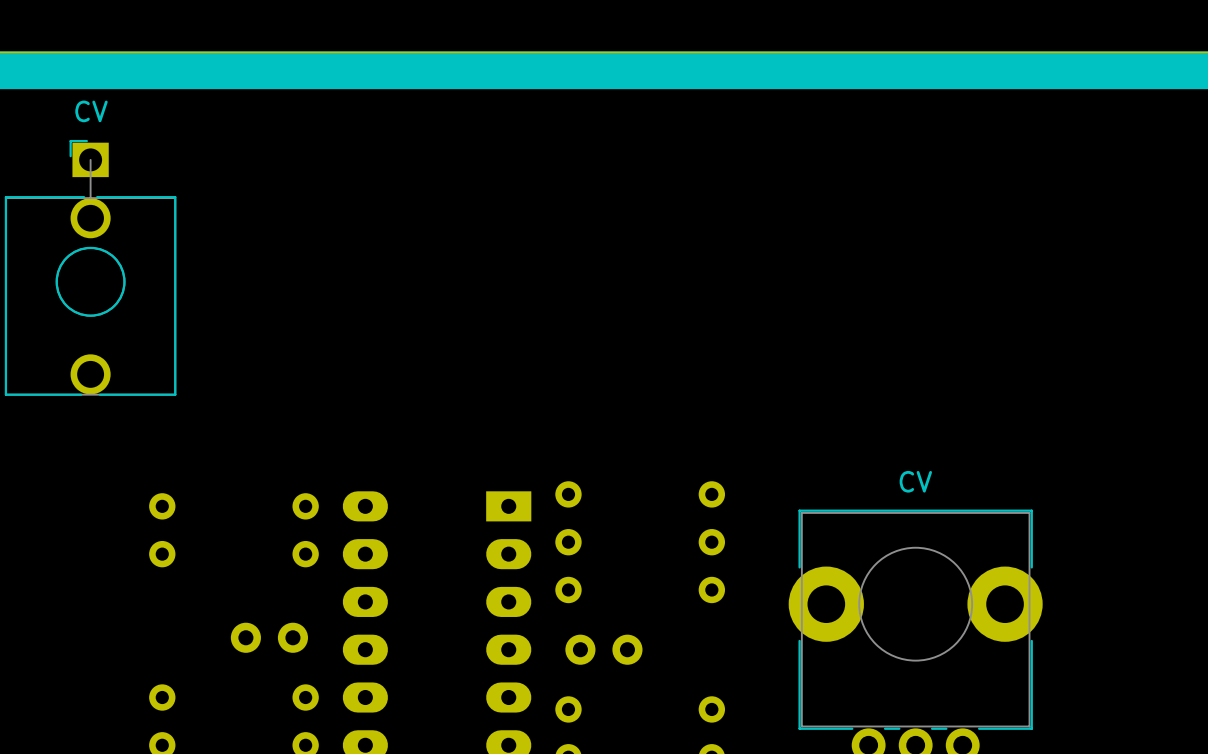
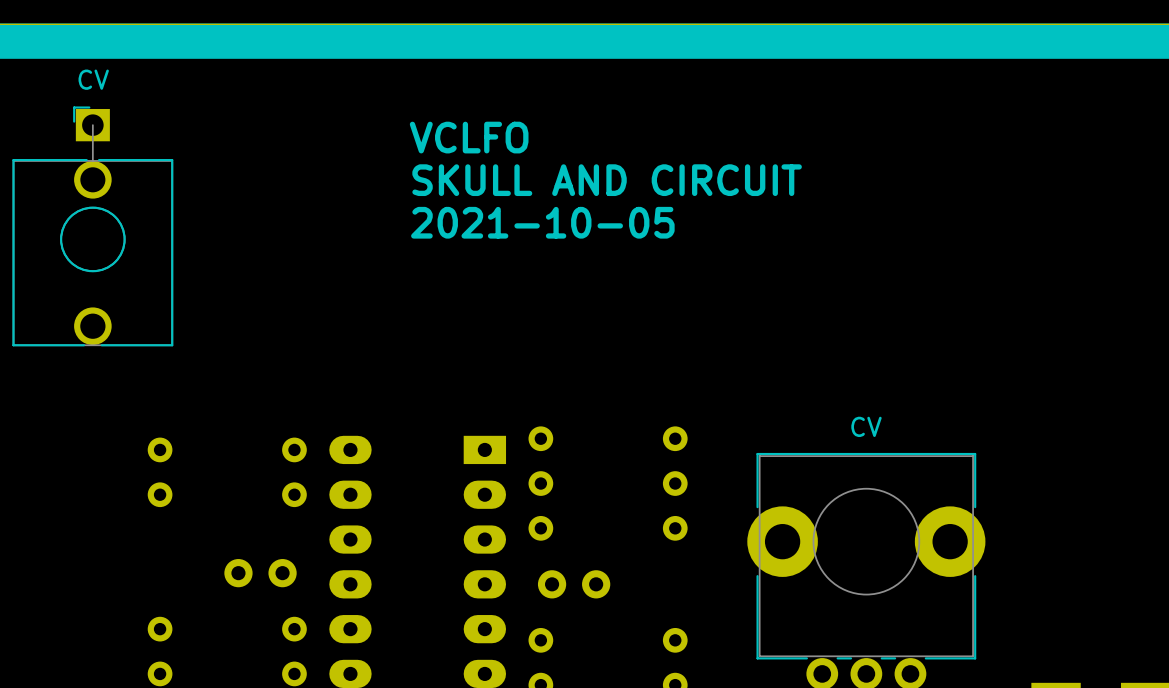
text: none -> VCLFO (469, 137)
text: none -> SKULL AND CIRCUIT (607, 180)
text: none -> 2021-10-05 (542, 222)

